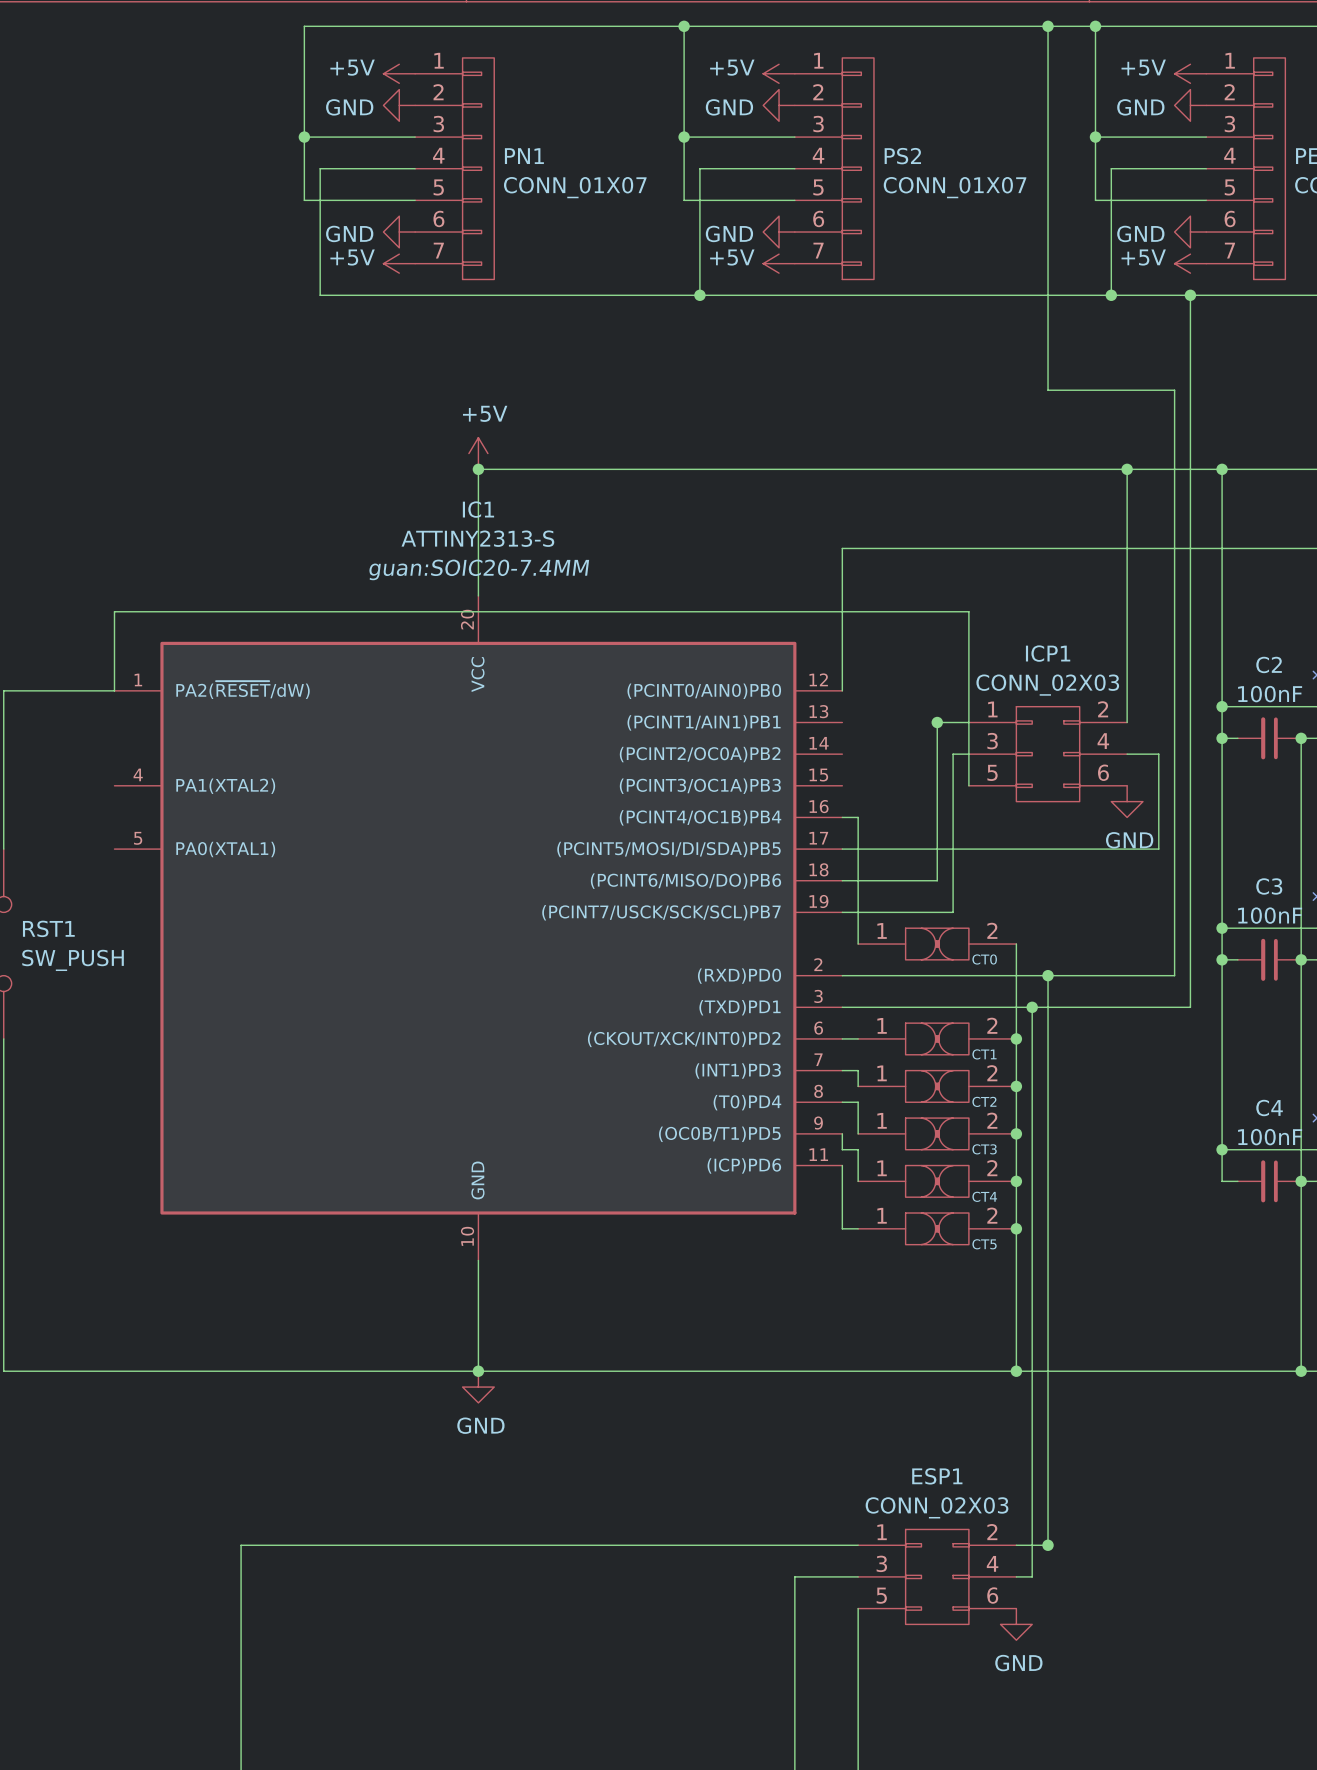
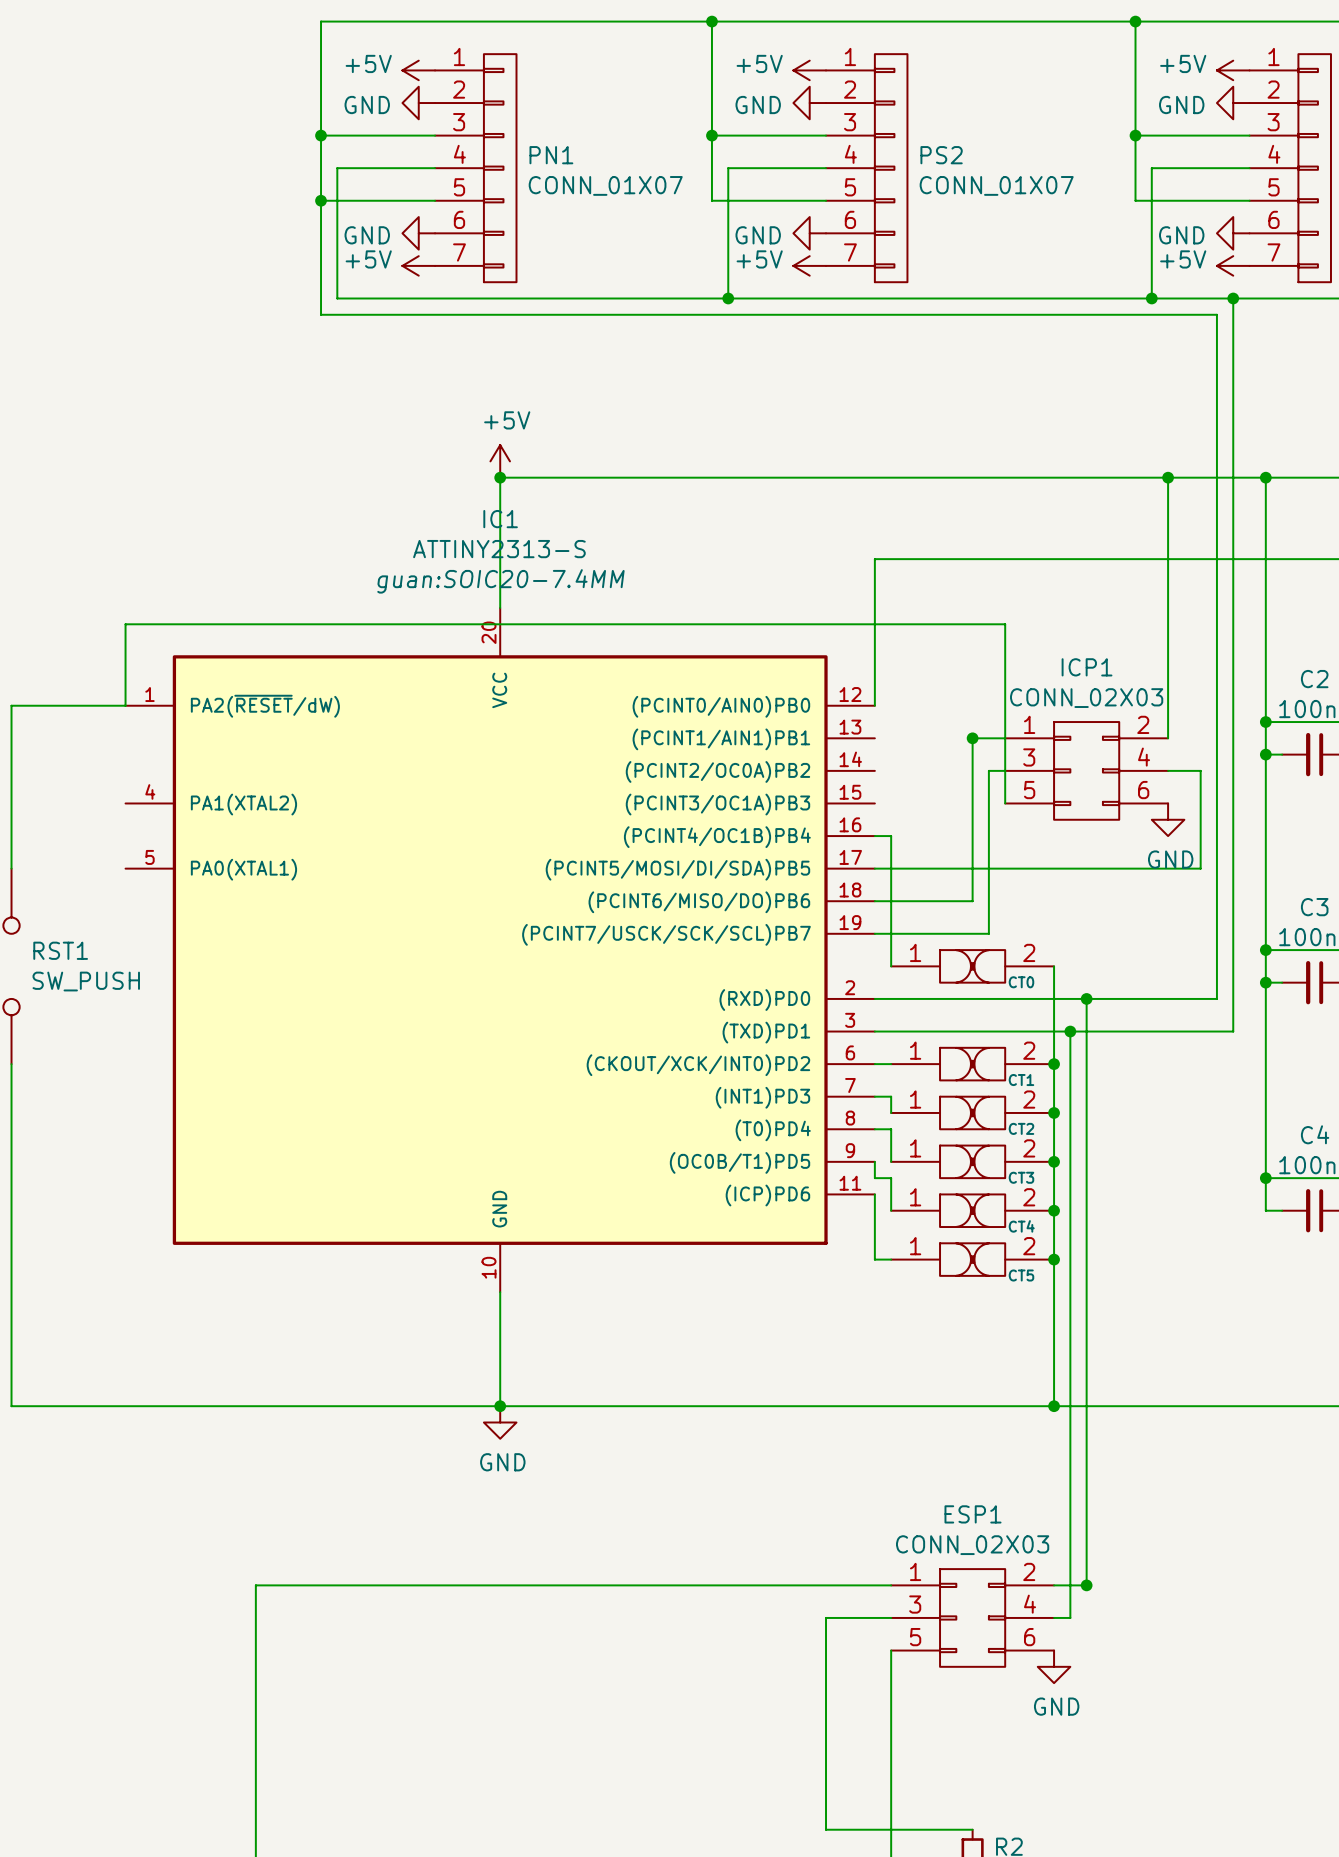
wire: (1048, 26) (1048, 390) (1174, 390) -> (321, 200) (321, 314) (1216, 314) (1216, 396)
junction: (1048, 26) -> none
junction: none -> (321, 200)

